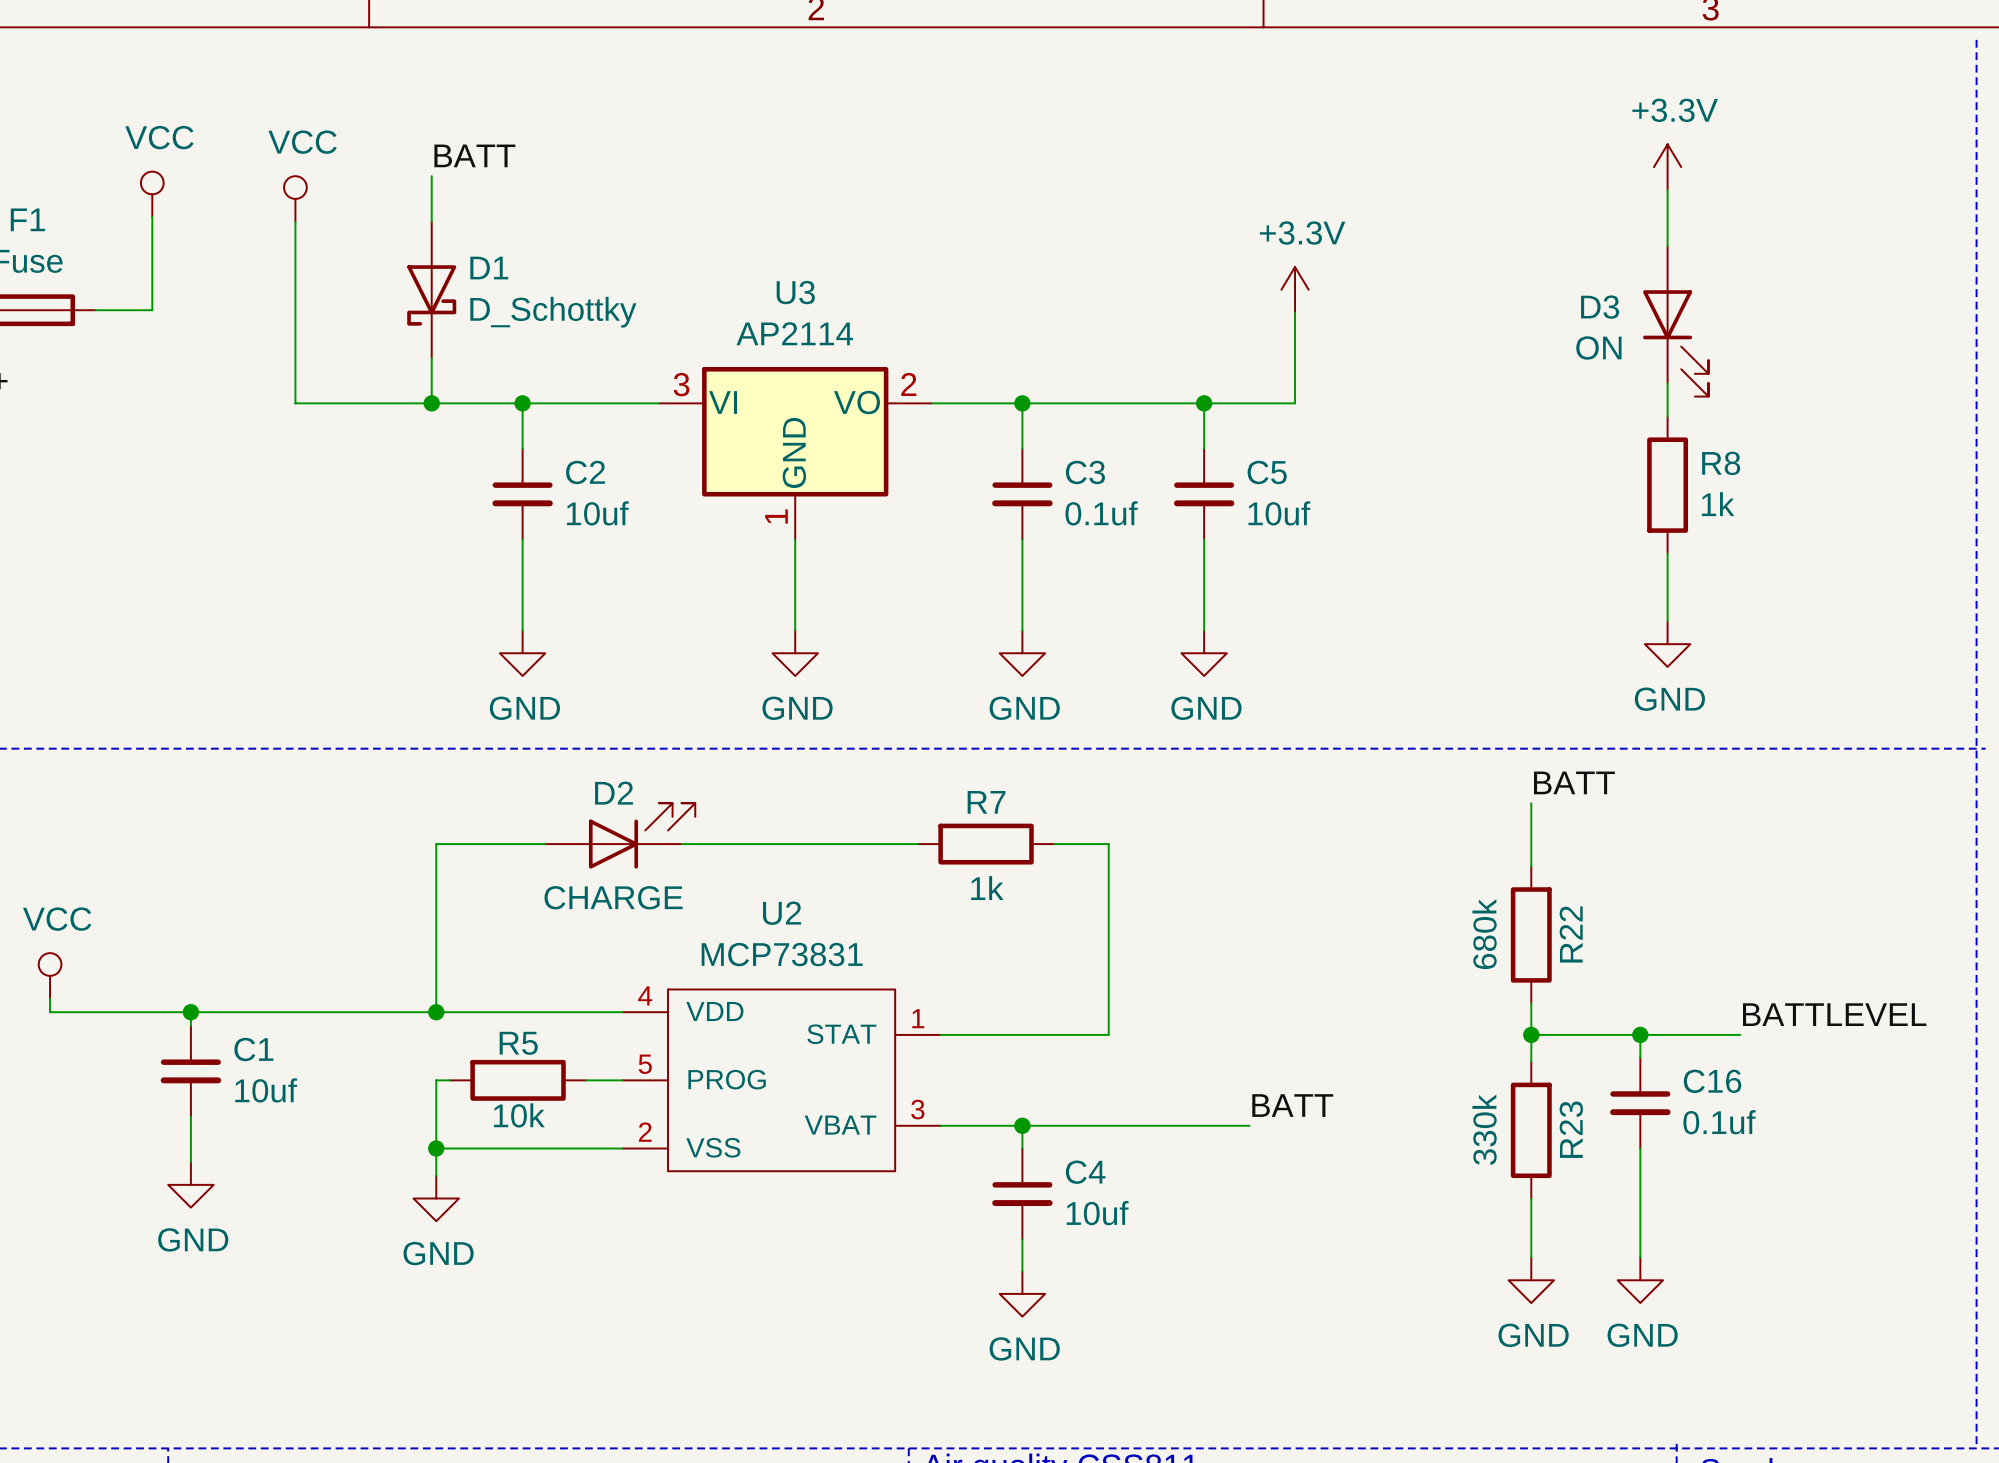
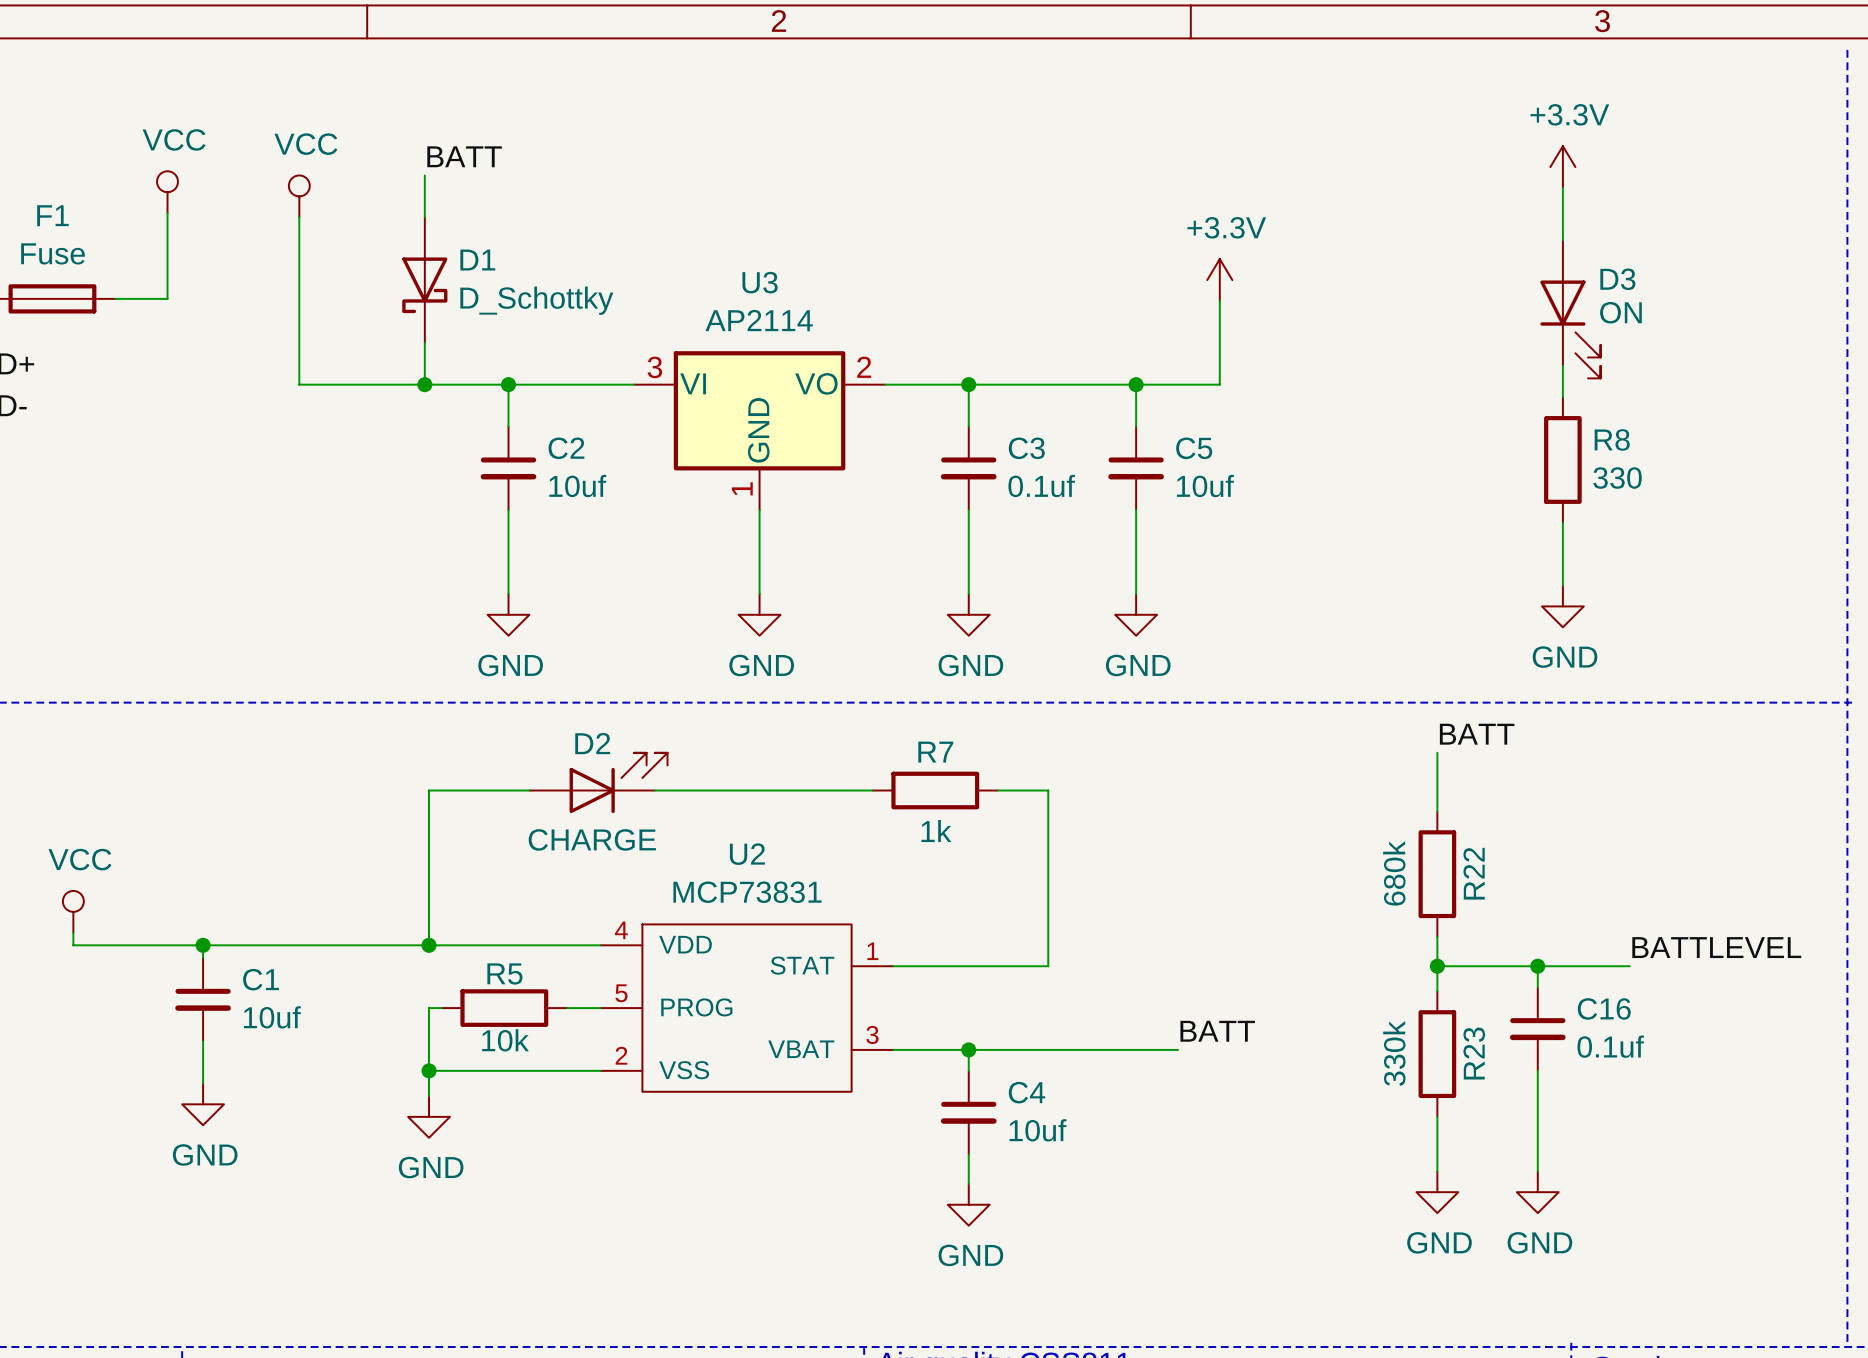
D3 name position: D3 (1600, 307) -> D3 (1617, 279)
D3 value position: ON (1598, 347) -> ON (1620, 312)
R8 value: 1k (1718, 504) -> 330 (1617, 478)

